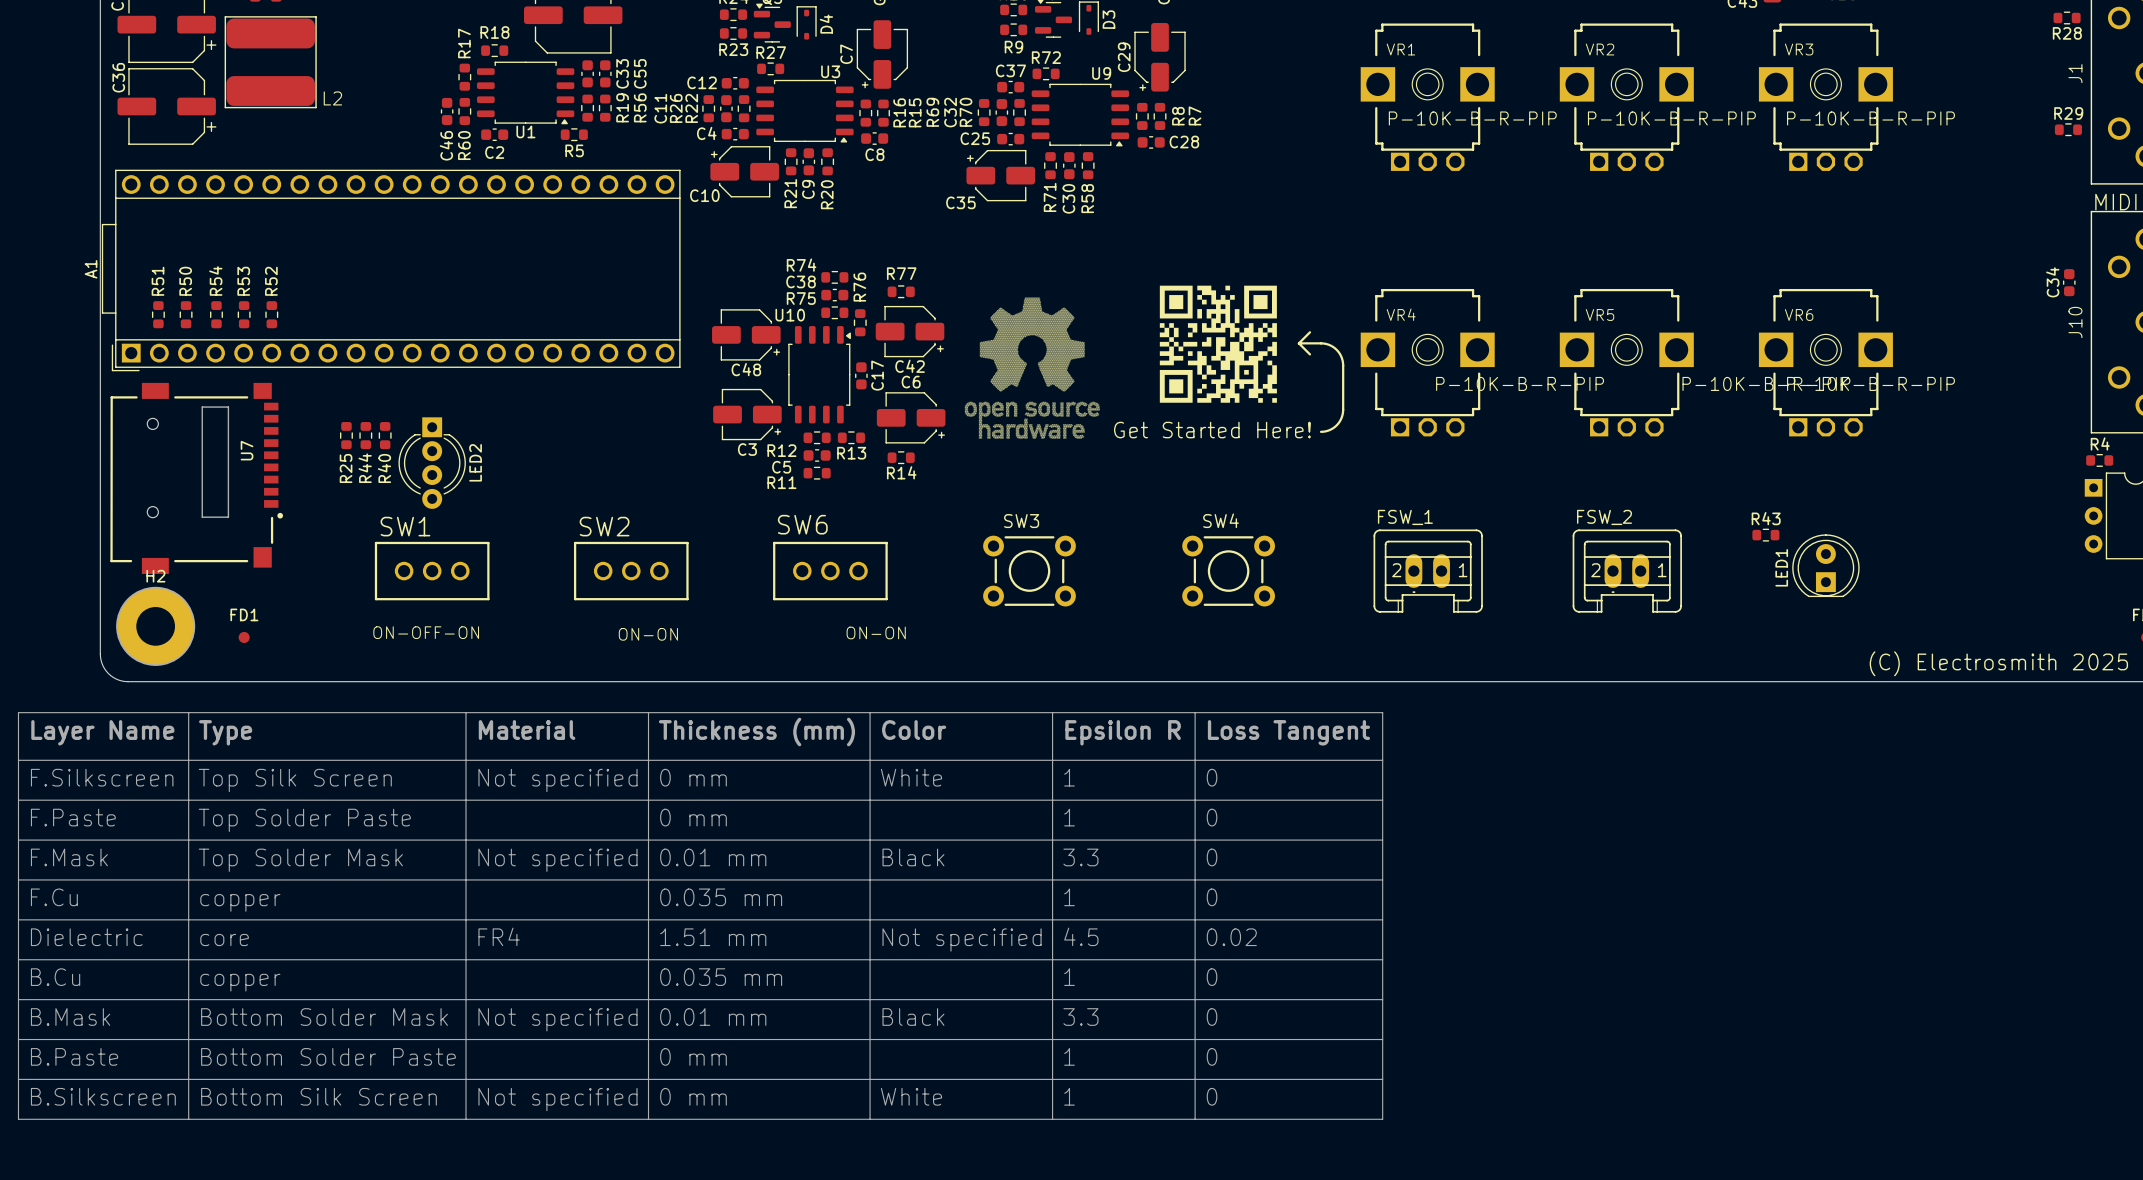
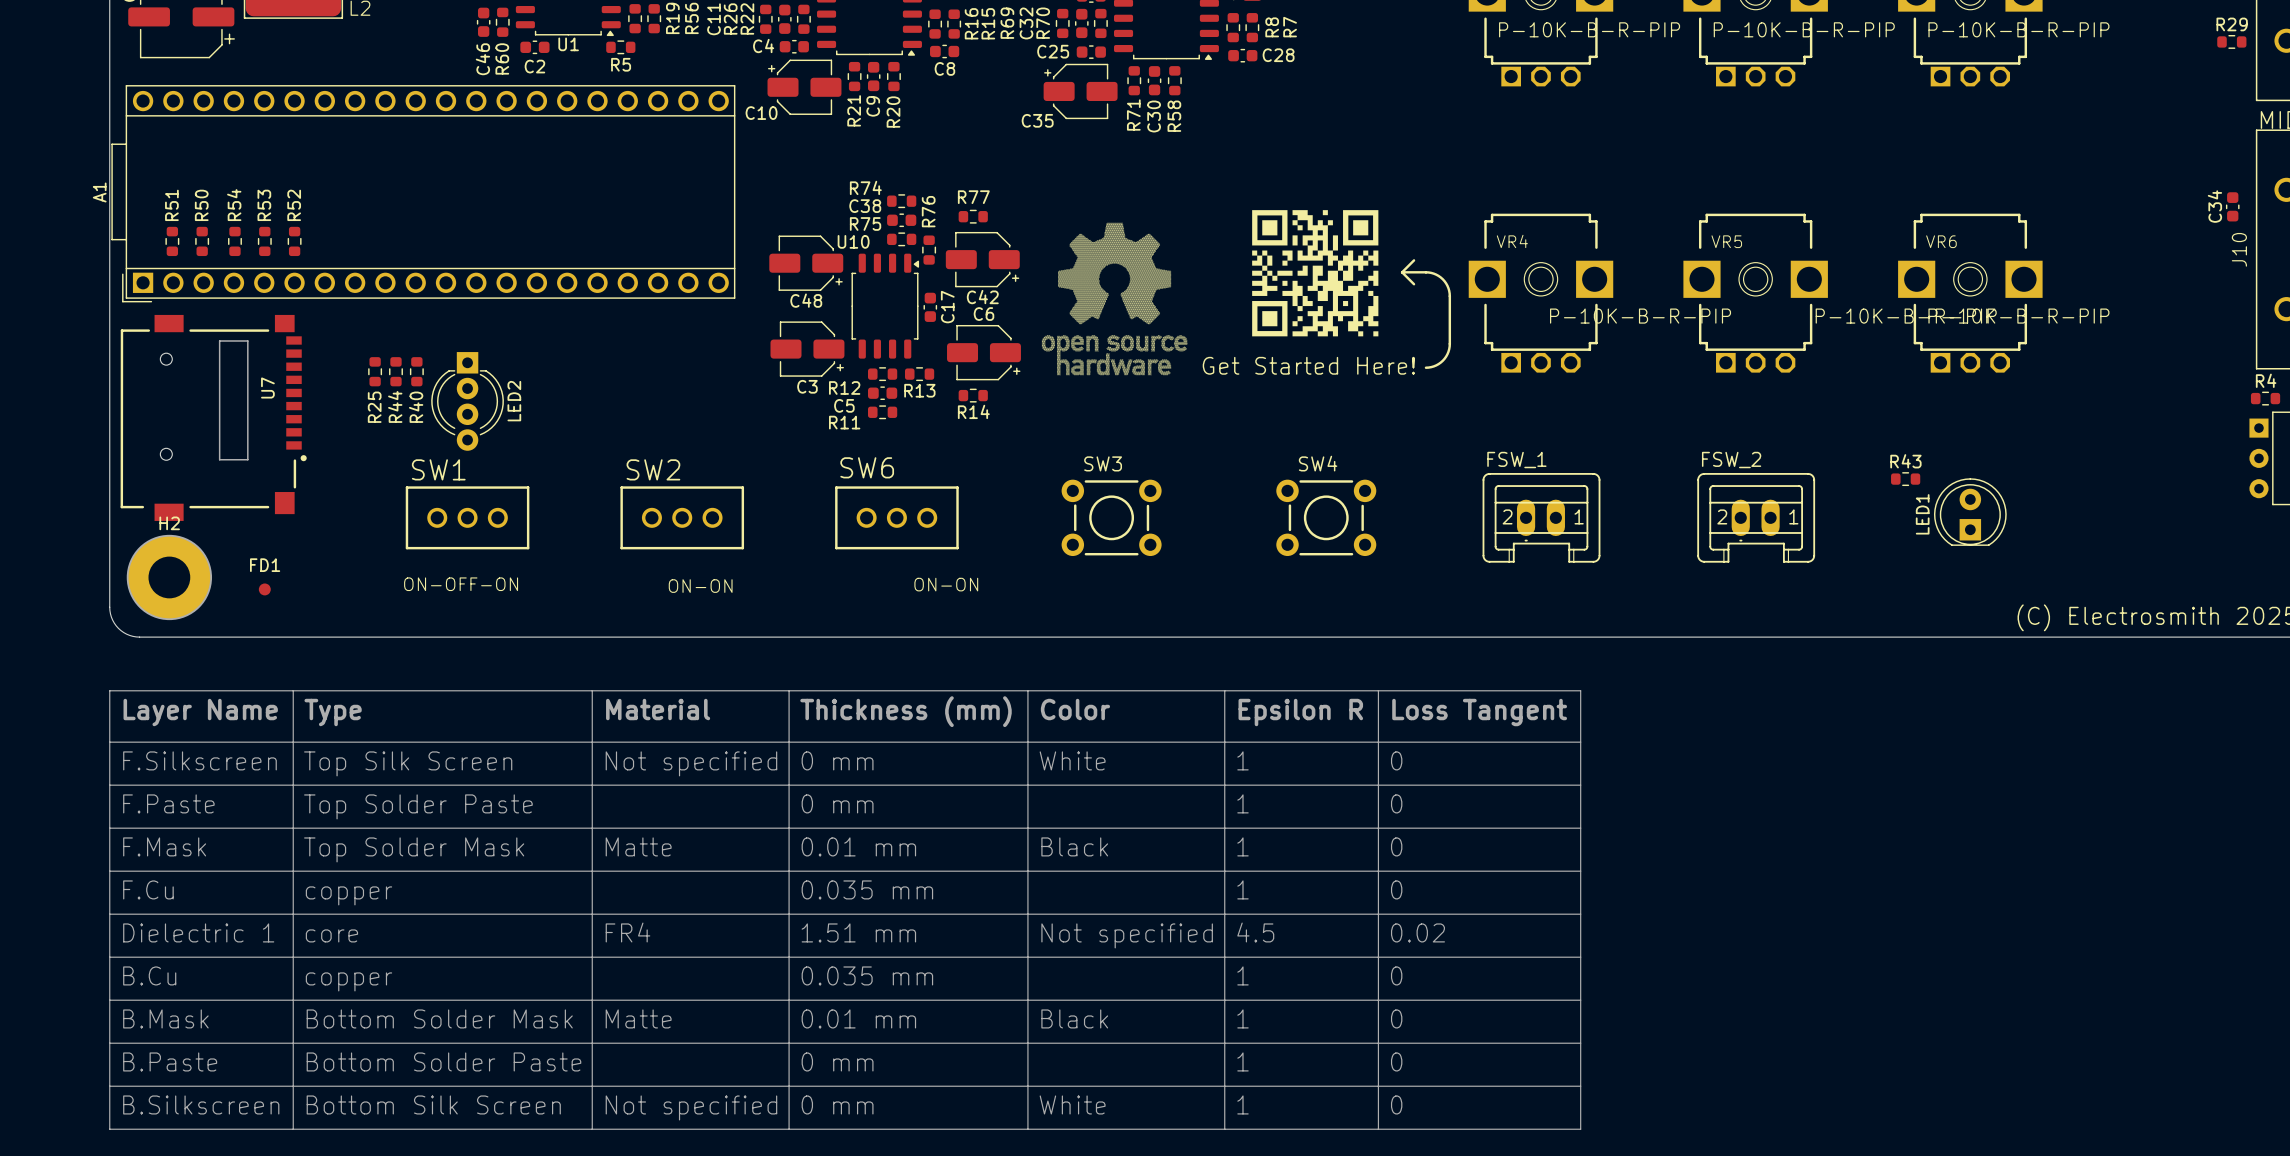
line: (18, 712) (18, 1119) (1382, 1119) (1382, 712) (18, 712) -> (109, 690) (109, 1129) (1580, 1129) (1580, 690) (109, 690)
line: (188, 712) (188, 1119) -> (293, 690) (293, 1129)
line: (466, 712) (466, 1119) -> (592, 690) (592, 1129)
line: (648, 712) (648, 1119) -> (789, 690) (789, 1129)
line: (870, 712) (870, 1119) -> (1027, 690) (1027, 1129)
line: (1052, 712) (1052, 1119) -> (1224, 690) (1224, 1129)
line: (1195, 712) (1195, 1119) -> (1378, 690) (1378, 1129)
text position: Material (527, 730) -> Material (658, 709)
text position: Color (914, 730) -> Color (1075, 709)
text position: Layer Name (102, 732) -> Layer Name (200, 712)
text position: Type (225, 732) -> Type (333, 712)
text position: Thickness (mm) (756, 732) -> Thickness (mm) (906, 711)
text position: Epsilon R (1123, 732) -> Epsilon R (1300, 712)
text position: Loss Tangent (1288, 732) -> Loss Tangent (1479, 712)
line: (18, 760) (1382, 760) -> (109, 742) (1580, 742)
text position: F.Silkscreen (102, 777) -> F.Silkscreen (199, 760)
text: 0 mm (693, 777) -> none
text position: White (911, 777) -> White (1072, 760)
text: 1 (1069, 777) -> none
text: 0 (1212, 777) -> none
text position: Top Silk Screen (295, 780) -> Top Silk Screen (408, 763)
text position: Not specified (557, 780) -> Not specified (691, 763)
text: none -> 0 mm (837, 760)
text: none -> 1 (1242, 760)
text: none -> 0 (1396, 760)
line: (18, 800) (1382, 800) -> (109, 785) (1580, 785)
text position: F.Paste (73, 817) -> F.Paste (168, 803)
text: 0 mm (693, 817) -> none
text: 1 (1069, 817) -> none
text: 0 (1212, 817) -> none
text position: Top Solder Paste (304, 820) -> Top Solder Paste (418, 806)
text: none -> 0 mm (837, 803)
text: none -> 1 (1242, 803)
text: none -> 0 (1396, 803)
line: (18, 840) (1382, 840) -> (109, 828) (1580, 828)
text position: F.Mask (69, 857) -> F.Mask (164, 846)
text: 0.01 mm (713, 857) -> none
text position: Black (913, 857) -> Black (1074, 846)
text: 3.3 (1080, 857) -> none
text: 0 (1212, 857) -> none
text position: Top Solder Mask (300, 860) -> Top Solder Mask (414, 849)
text: Not specified (557, 860) -> none
text: none -> Matte (638, 846)
text: none -> 0.01 mm (858, 846)
text: none -> 1 (1242, 846)
text: none -> 0 (1396, 846)
line: (18, 879) (1382, 879) -> (109, 871) (1580, 871)
text position: F.Cu (54, 897) -> F.Cu (148, 889)
text: 0.035 mm (721, 897) -> none
text: 1 (1069, 897) -> none
text: 0 (1212, 897) -> none
text position: copper (240, 902) -> copper (348, 895)
text: none -> 0.035 mm (867, 889)
text: none -> 1 (1242, 889)
text: none -> 0 (1396, 889)
line: (18, 919) (1382, 919) -> (109, 914) (1580, 914)
text position: FR4 (499, 936) -> FR4 (627, 932)
text position: 4.5 (1081, 936) -> 4.5 (1255, 932)
text: Dielectric (86, 937) -> Dielectric 1 (198, 932)
text position: 1.51 mm (713, 937) -> 1.51 mm (858, 932)
text position: 0.02 (1231, 937) -> 0.02 (1417, 932)
text position: core (224, 940) -> core (331, 935)
text position: Not specified (962, 940) -> Not specified (1127, 935)
line: (18, 959) (1382, 959) -> (109, 957) (1580, 957)
text position: B.Cu (55, 977) -> B.Cu (149, 975)
text: 0.035 mm (721, 977) -> none
text: 1 (1069, 977) -> none
text: 0 (1212, 977) -> none
text position: copper (240, 982) -> copper (348, 981)
text: none -> 0.035 mm (867, 975)
text: none -> 1 (1242, 975)
text: none -> 0 (1396, 975)
line: (18, 999) (1382, 999) -> (109, 1000) (1580, 1000)
text position: B.Mask (70, 1017) -> B.Mask (165, 1018)
text position: Bottom Solder Mask (324, 1017) -> Bottom Solder Mask (439, 1018)
text: 0.01 mm (713, 1017) -> none
text position: Black (913, 1017) -> Black (1074, 1018)
text: 3.3 (1080, 1017) -> none
text: 0 (1212, 1017) -> none
text: Not specified (557, 1019) -> none
text: none -> Matte (638, 1018)
text: none -> 0.01 mm (858, 1018)
text: none -> 1 (1242, 1018)
text: none -> 0 (1396, 1018)
line: (18, 1039) (1382, 1039) -> (109, 1043) (1580, 1043)
text position: B.Paste (74, 1056) -> B.Paste (170, 1061)
text position: Bottom Solder Paste (328, 1056) -> Bottom Solder Paste (443, 1061)
text: 0 mm (693, 1056) -> none
text: 1 (1069, 1056) -> none
text: 0 (1212, 1056) -> none
text: none -> 0 mm (837, 1061)
text: none -> 1 (1242, 1061)
text: none -> 0 (1396, 1061)
line: (18, 1079) (1382, 1079) -> (109, 1086) (1580, 1086)
text position: B.Silkscreen (103, 1096) -> B.Silkscreen (201, 1104)
text position: Bottom Silk Screen (318, 1096) -> Bottom Silk Screen (433, 1104)
text: 0 mm (693, 1096) -> none
text position: White (911, 1096) -> White (1072, 1104)
text: 1 (1069, 1096) -> none
text: 0 (1212, 1096) -> none
text position: Not specified (557, 1099) -> Not specified (691, 1107)
text: none -> 0 mm (837, 1104)
text: none -> 1 (1242, 1104)
text: none -> 0 (1396, 1104)

